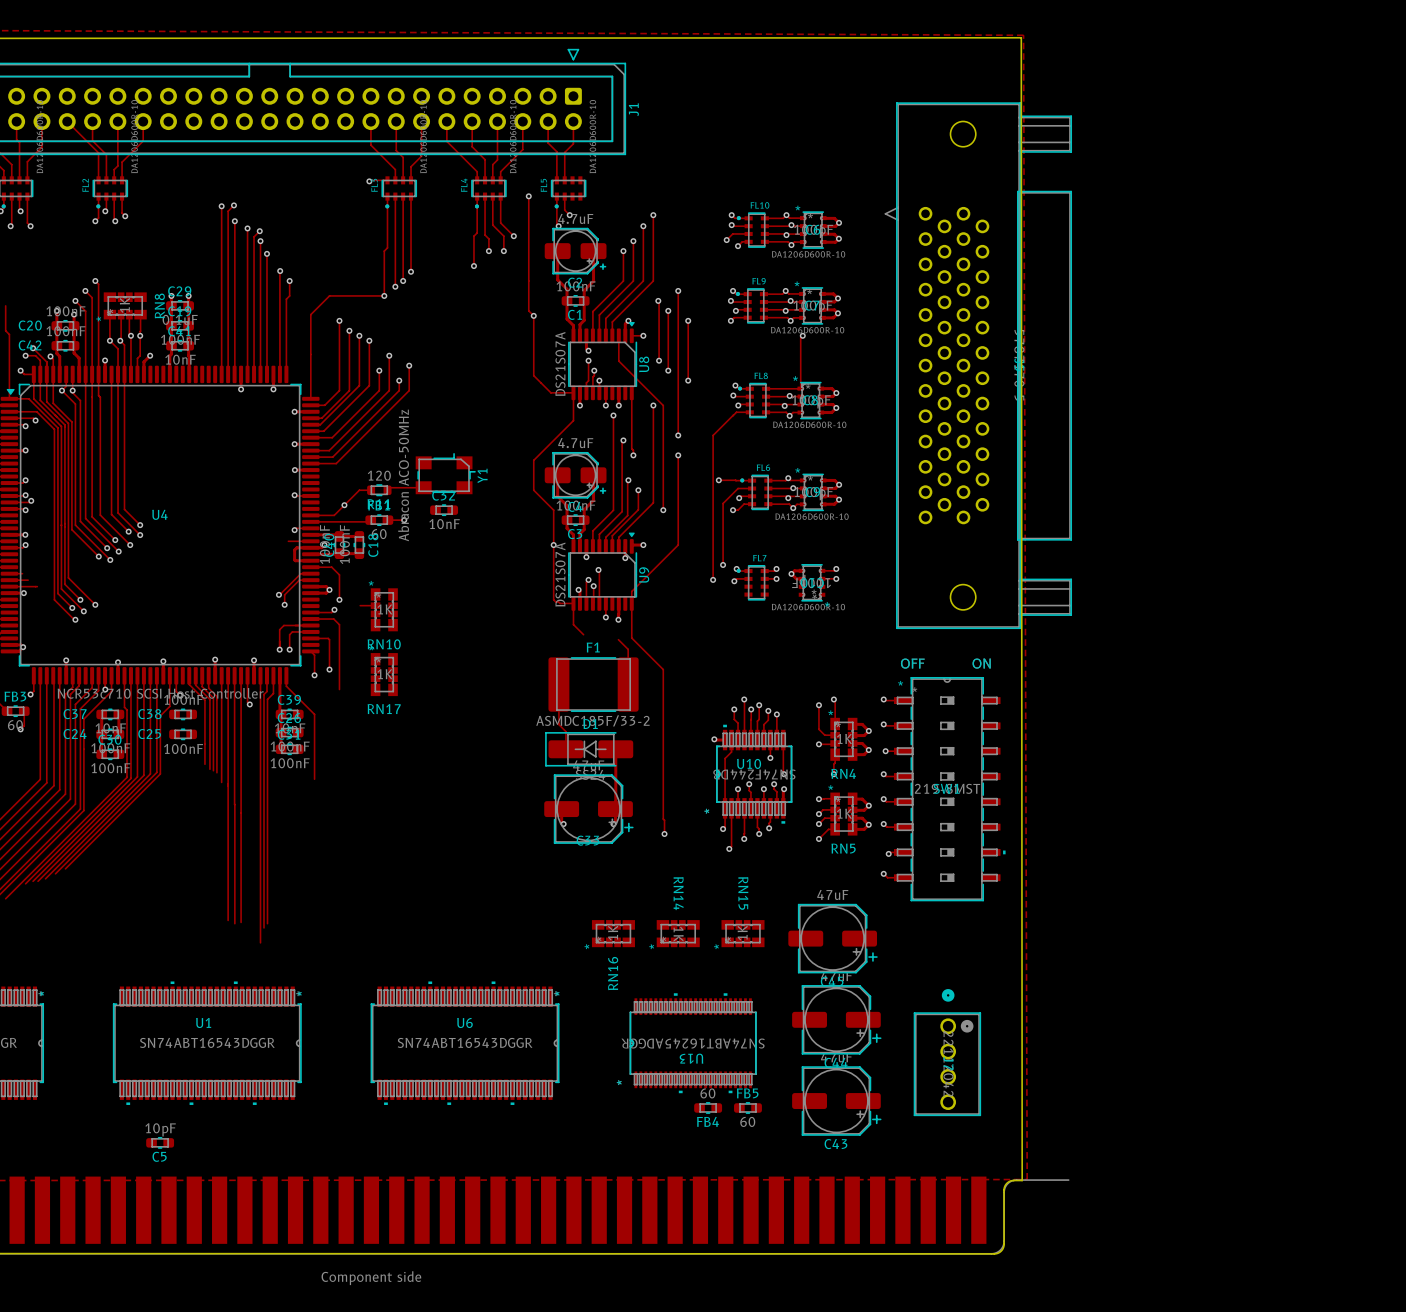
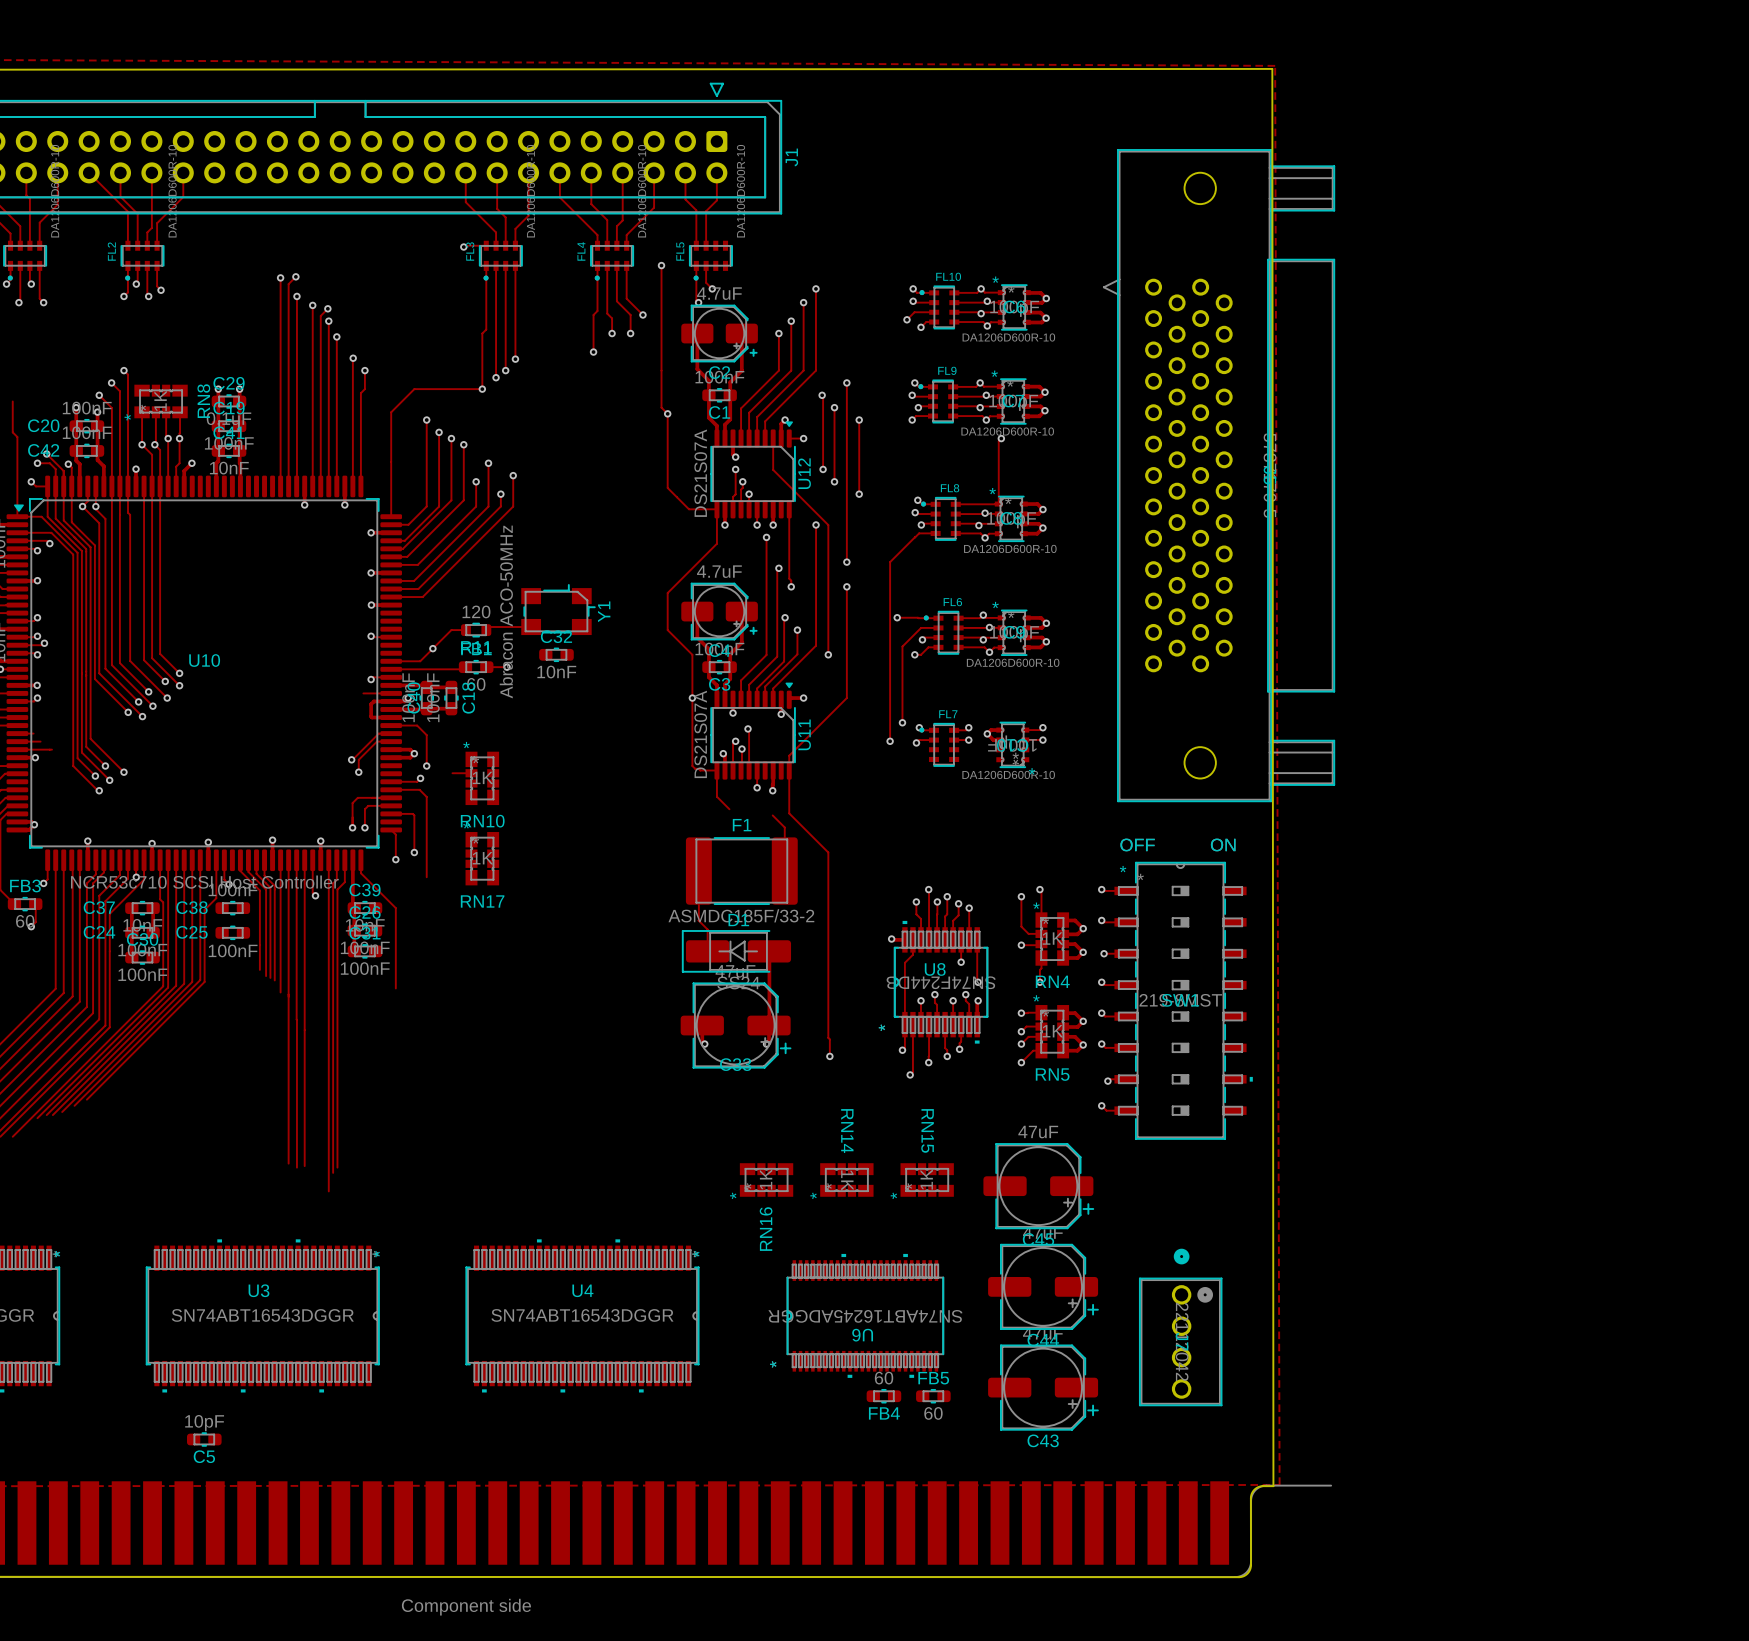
U8 name: U8 (644, 364) -> U12 (804, 473)
U4 name: U4 (159, 514) -> U10 (204, 660)
U9 name: U9 (644, 575) -> U11 (804, 734)
U10 name: U10 (749, 763) -> U8 (935, 969)
U1 name: U1 (203, 1022) -> U3 (258, 1290)
U6 name: U6 (464, 1022) -> U4 (582, 1290)
U13 name: U13 (691, 1058) -> U6 (862, 1335)

